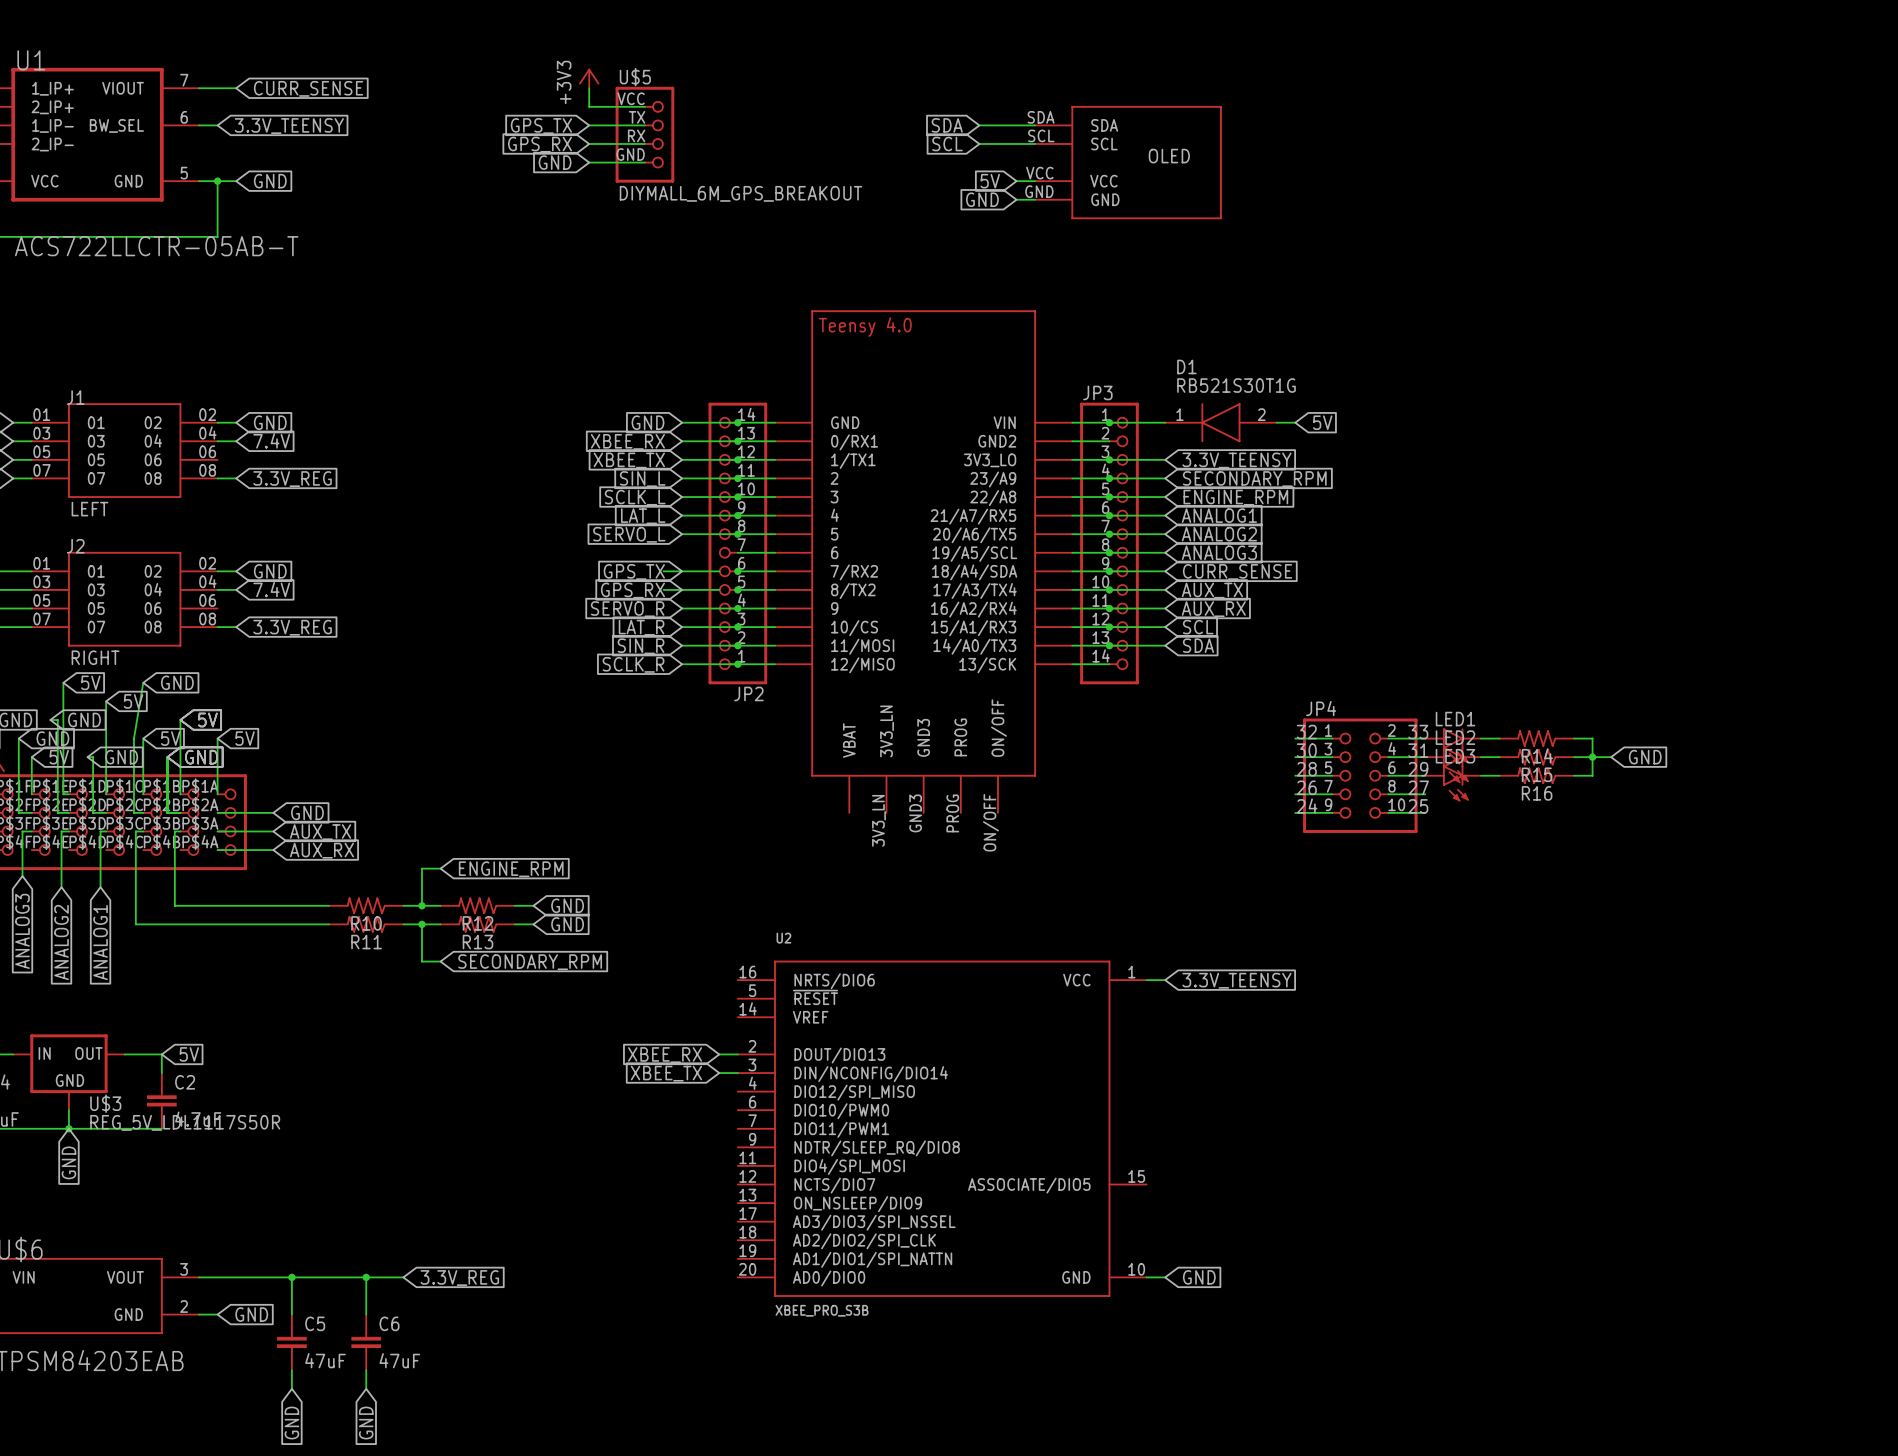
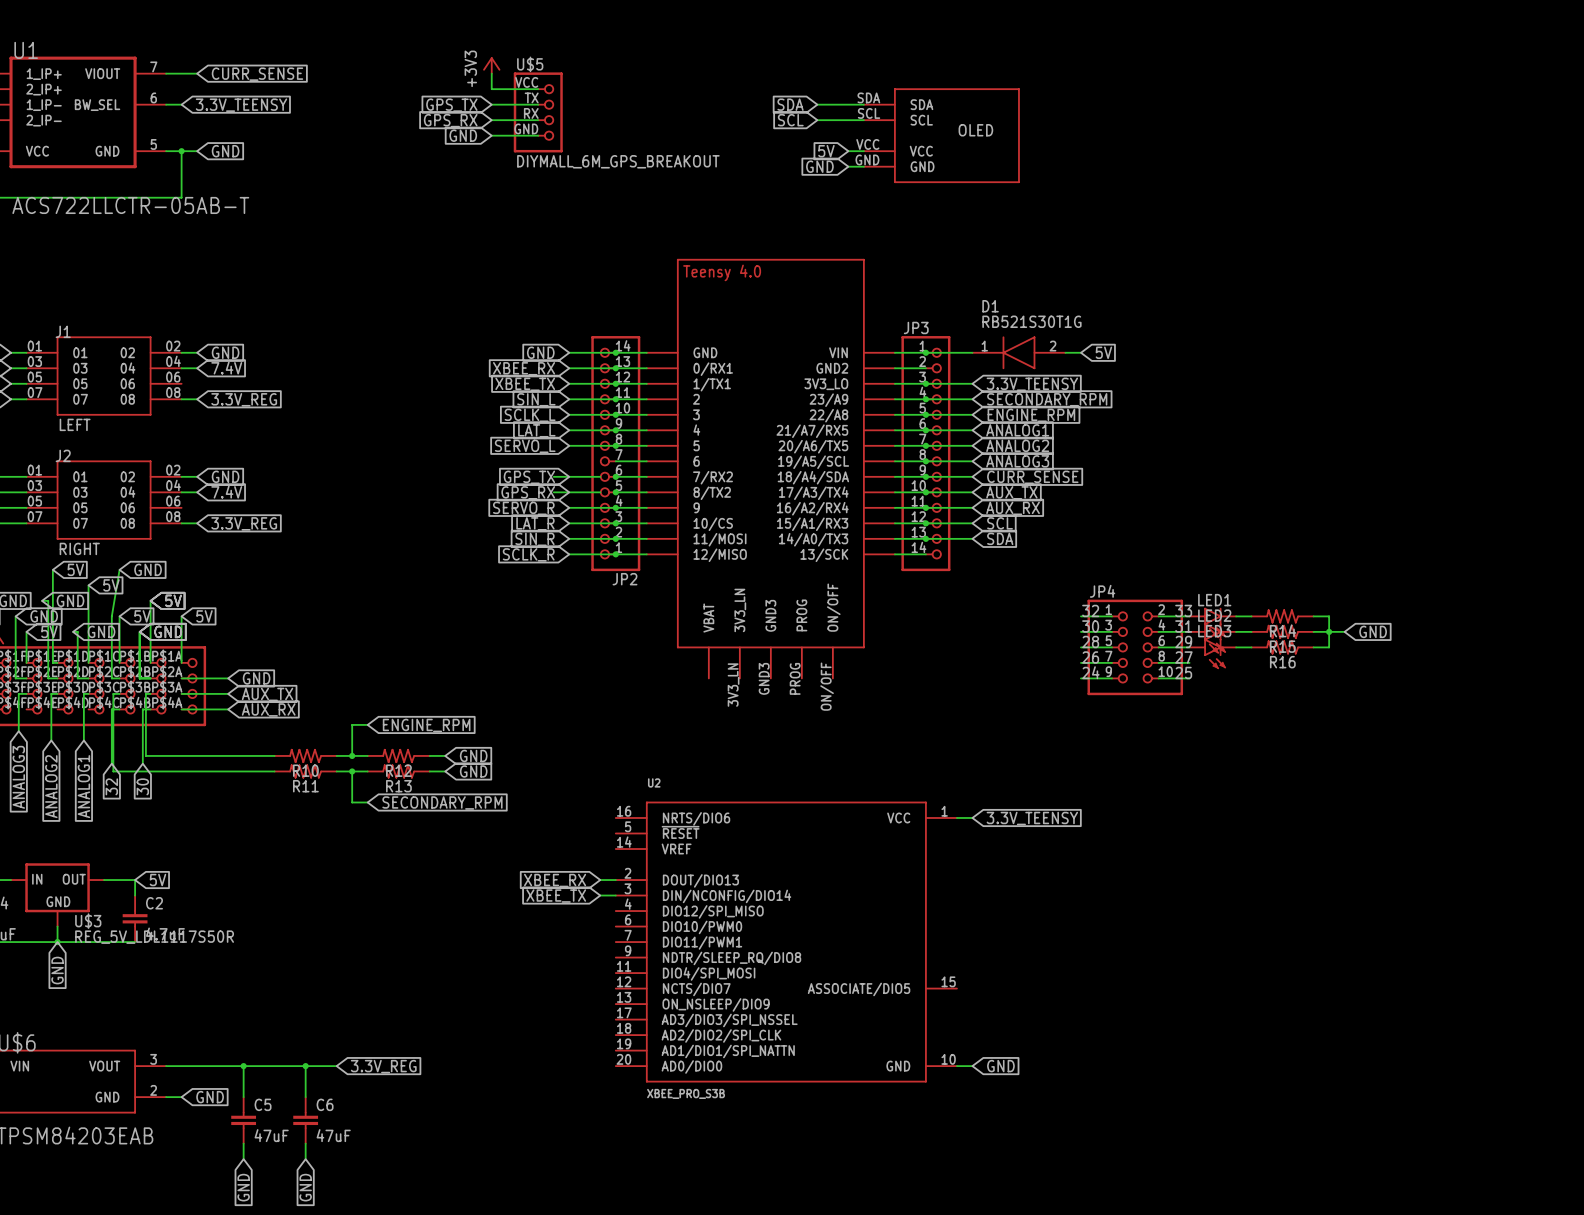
wire: none -> (119, 709) (111, 709) (111, 763)
wire: none -> (150, 709) (142, 709) (142, 763)
global label: none -> 32 (111, 786)
global label: none -> 30 (142, 786)

